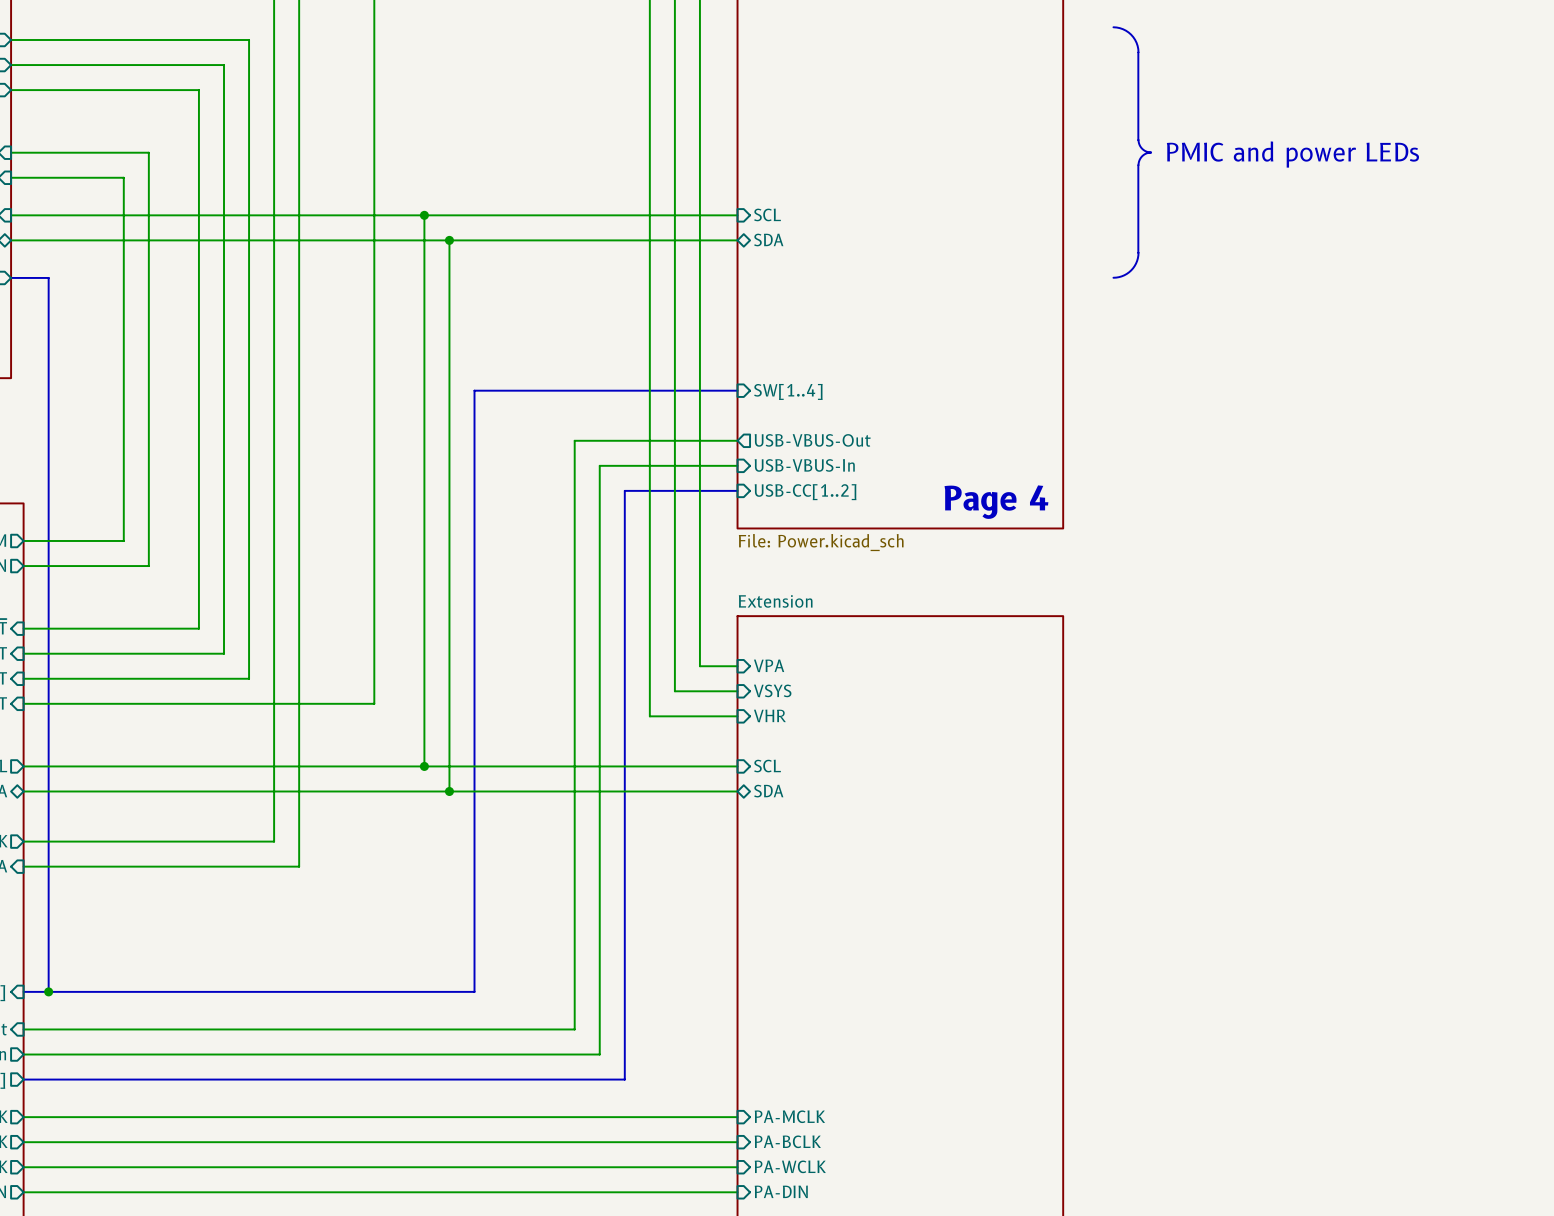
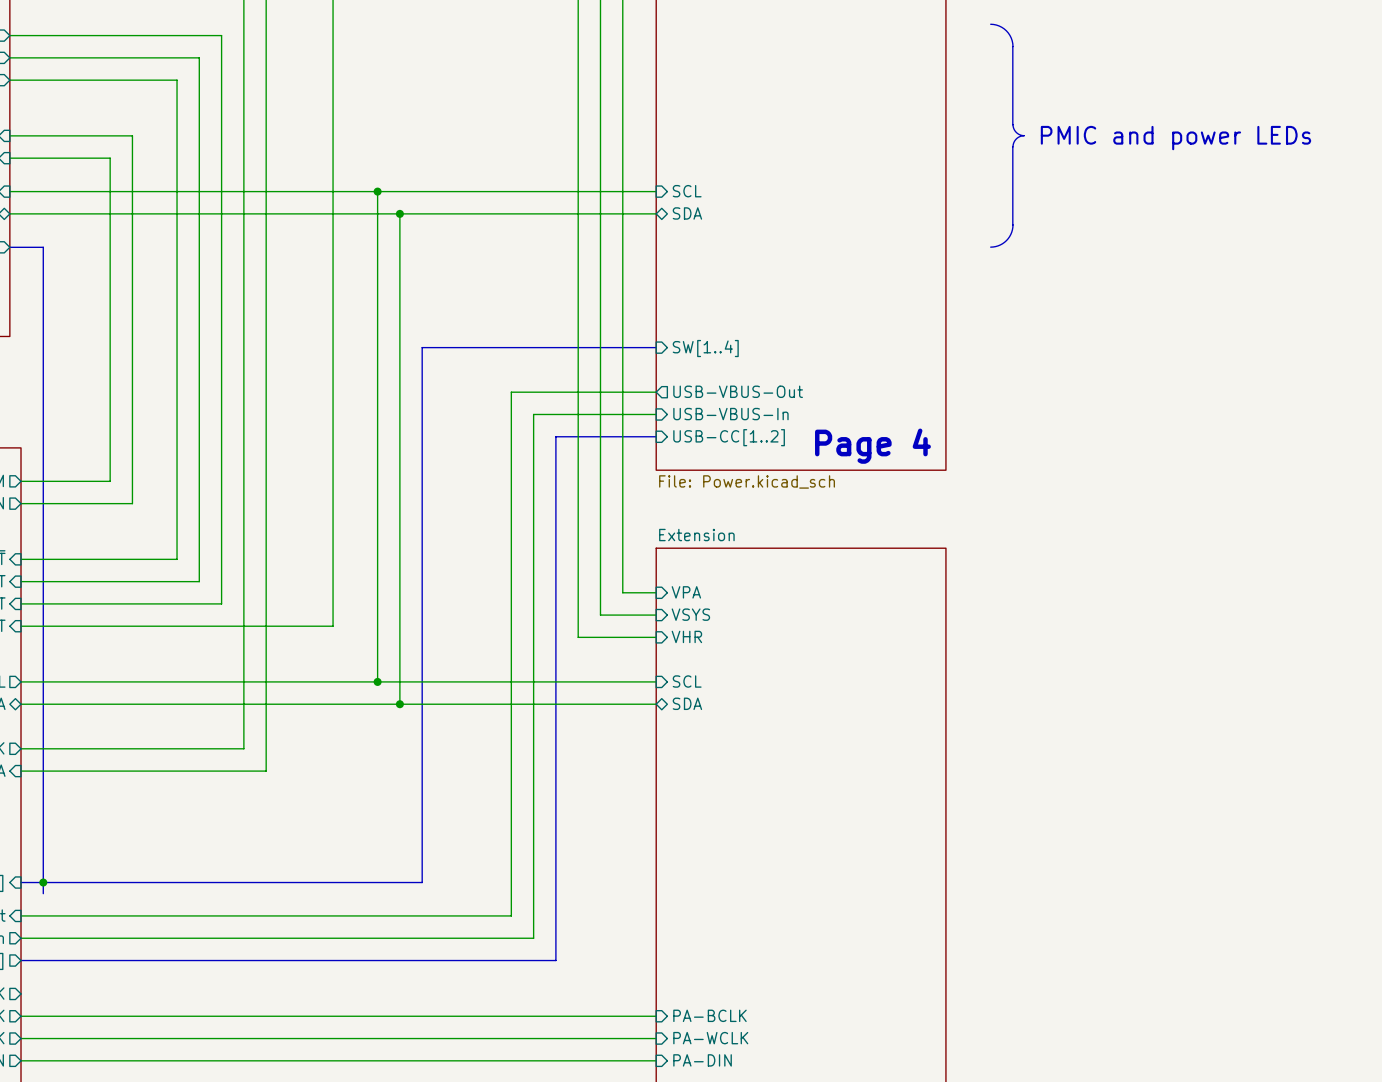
bus: none -> (43, 882) (43, 893)
sheet pin: PA-MCLK (789, 1116) -> none
wire: (23, 1117) (737, 1117) -> none

